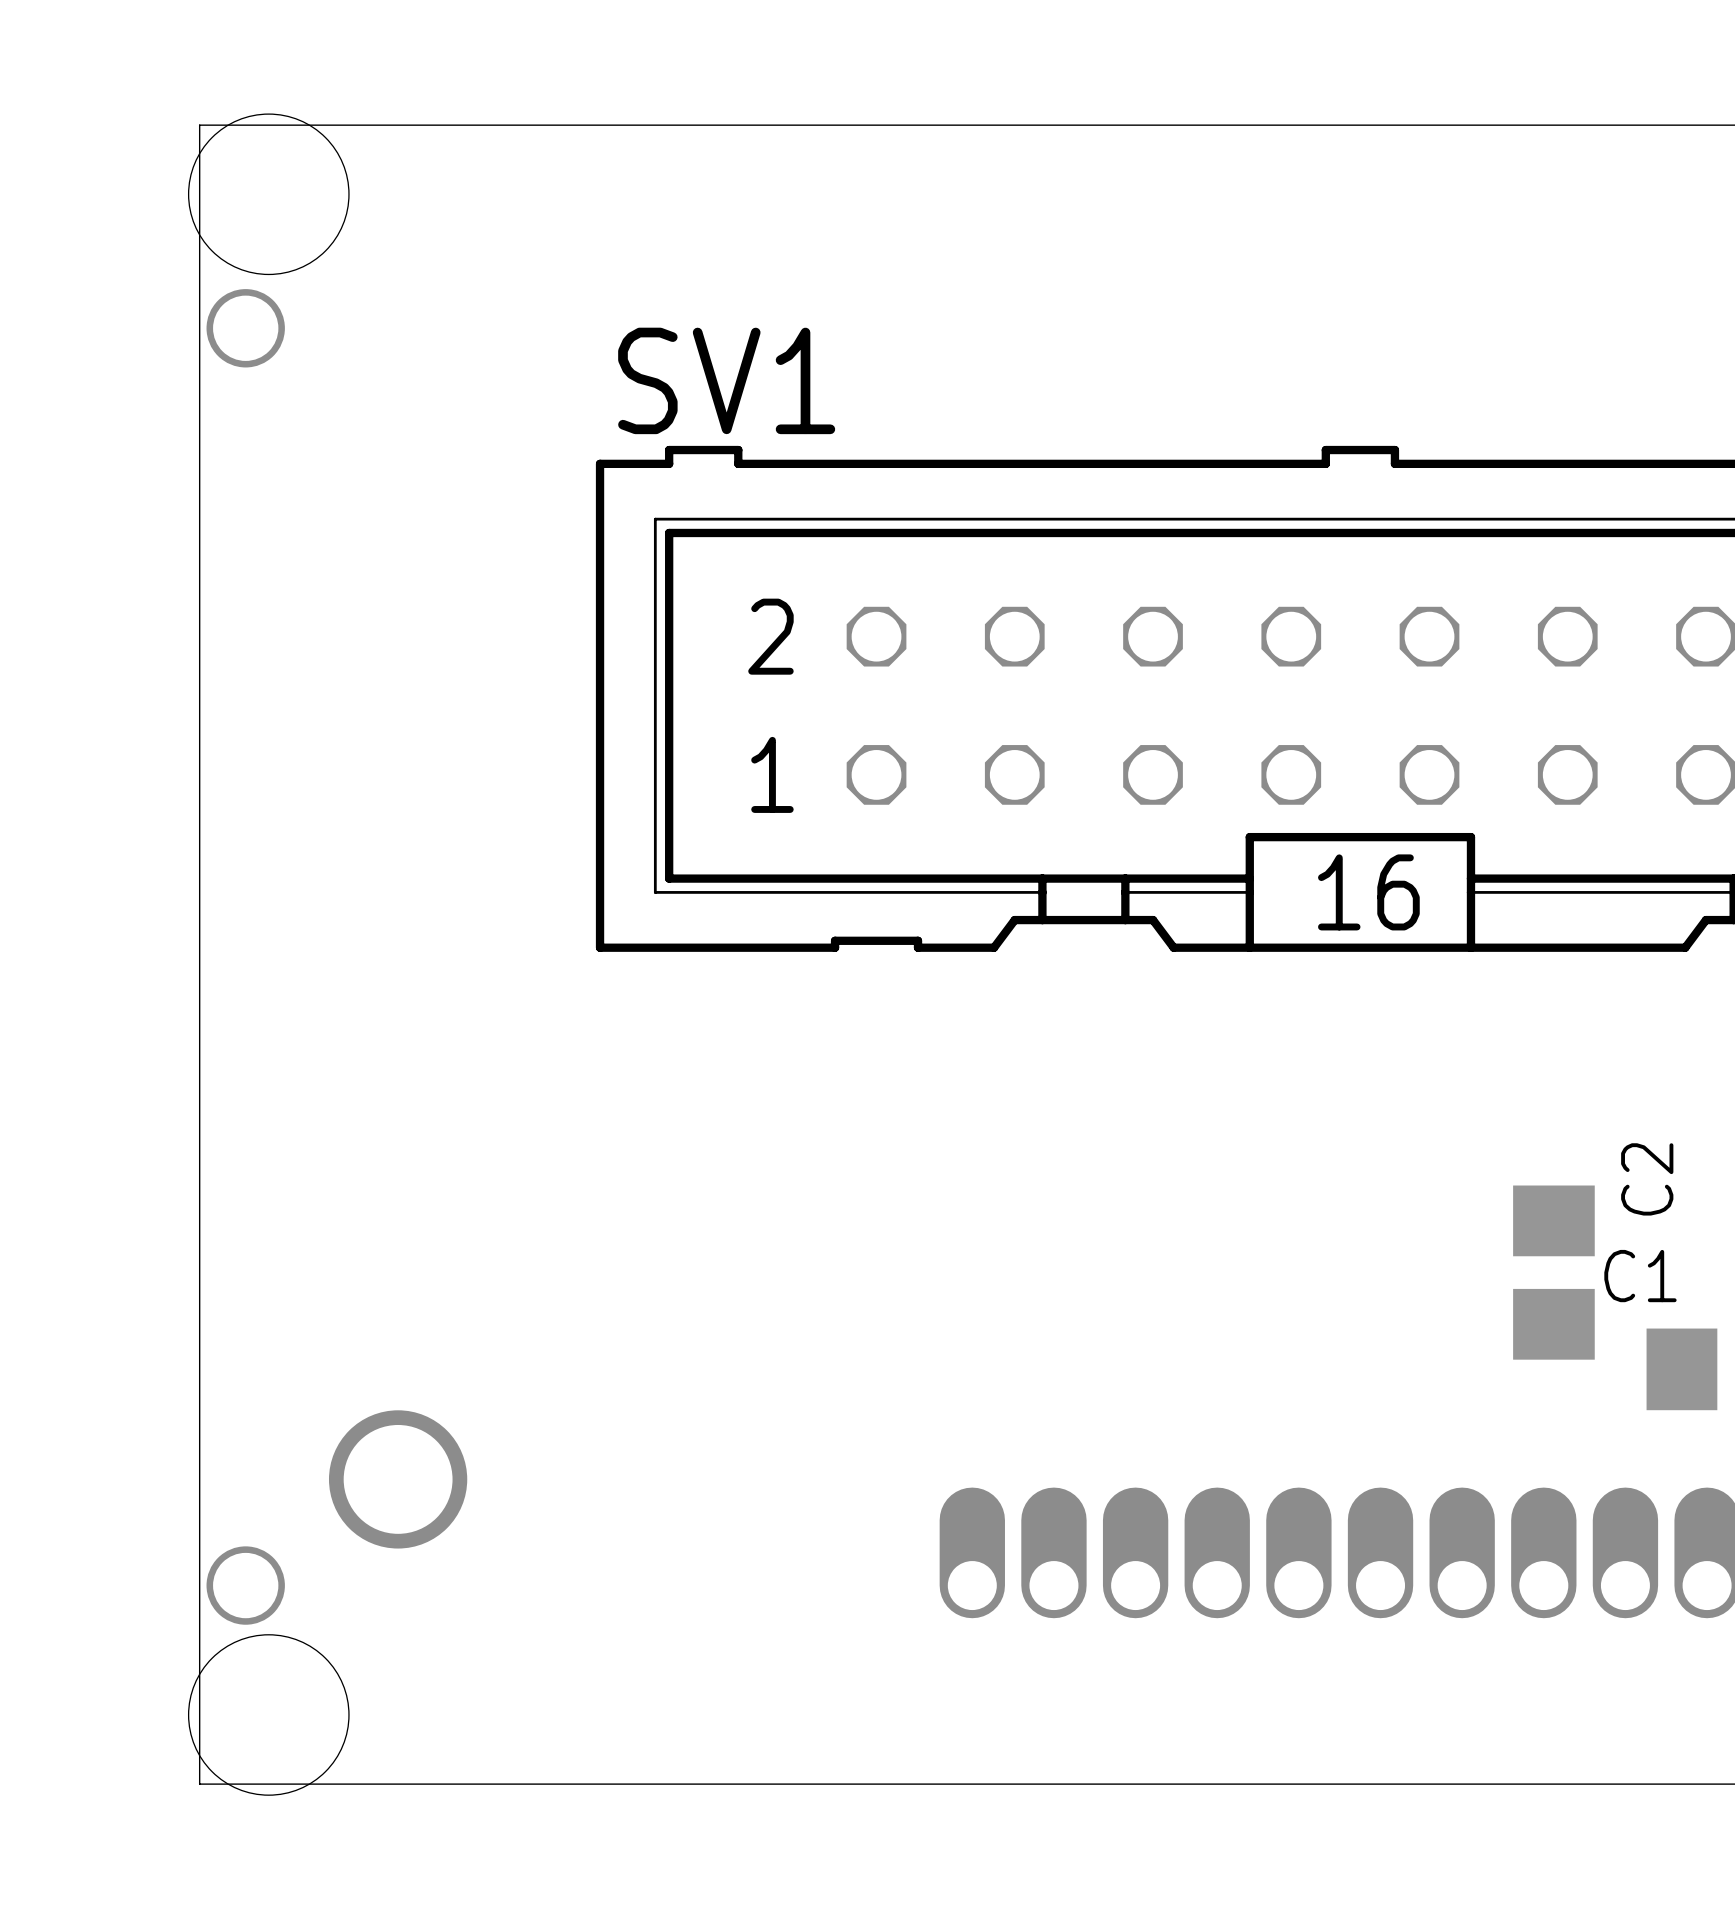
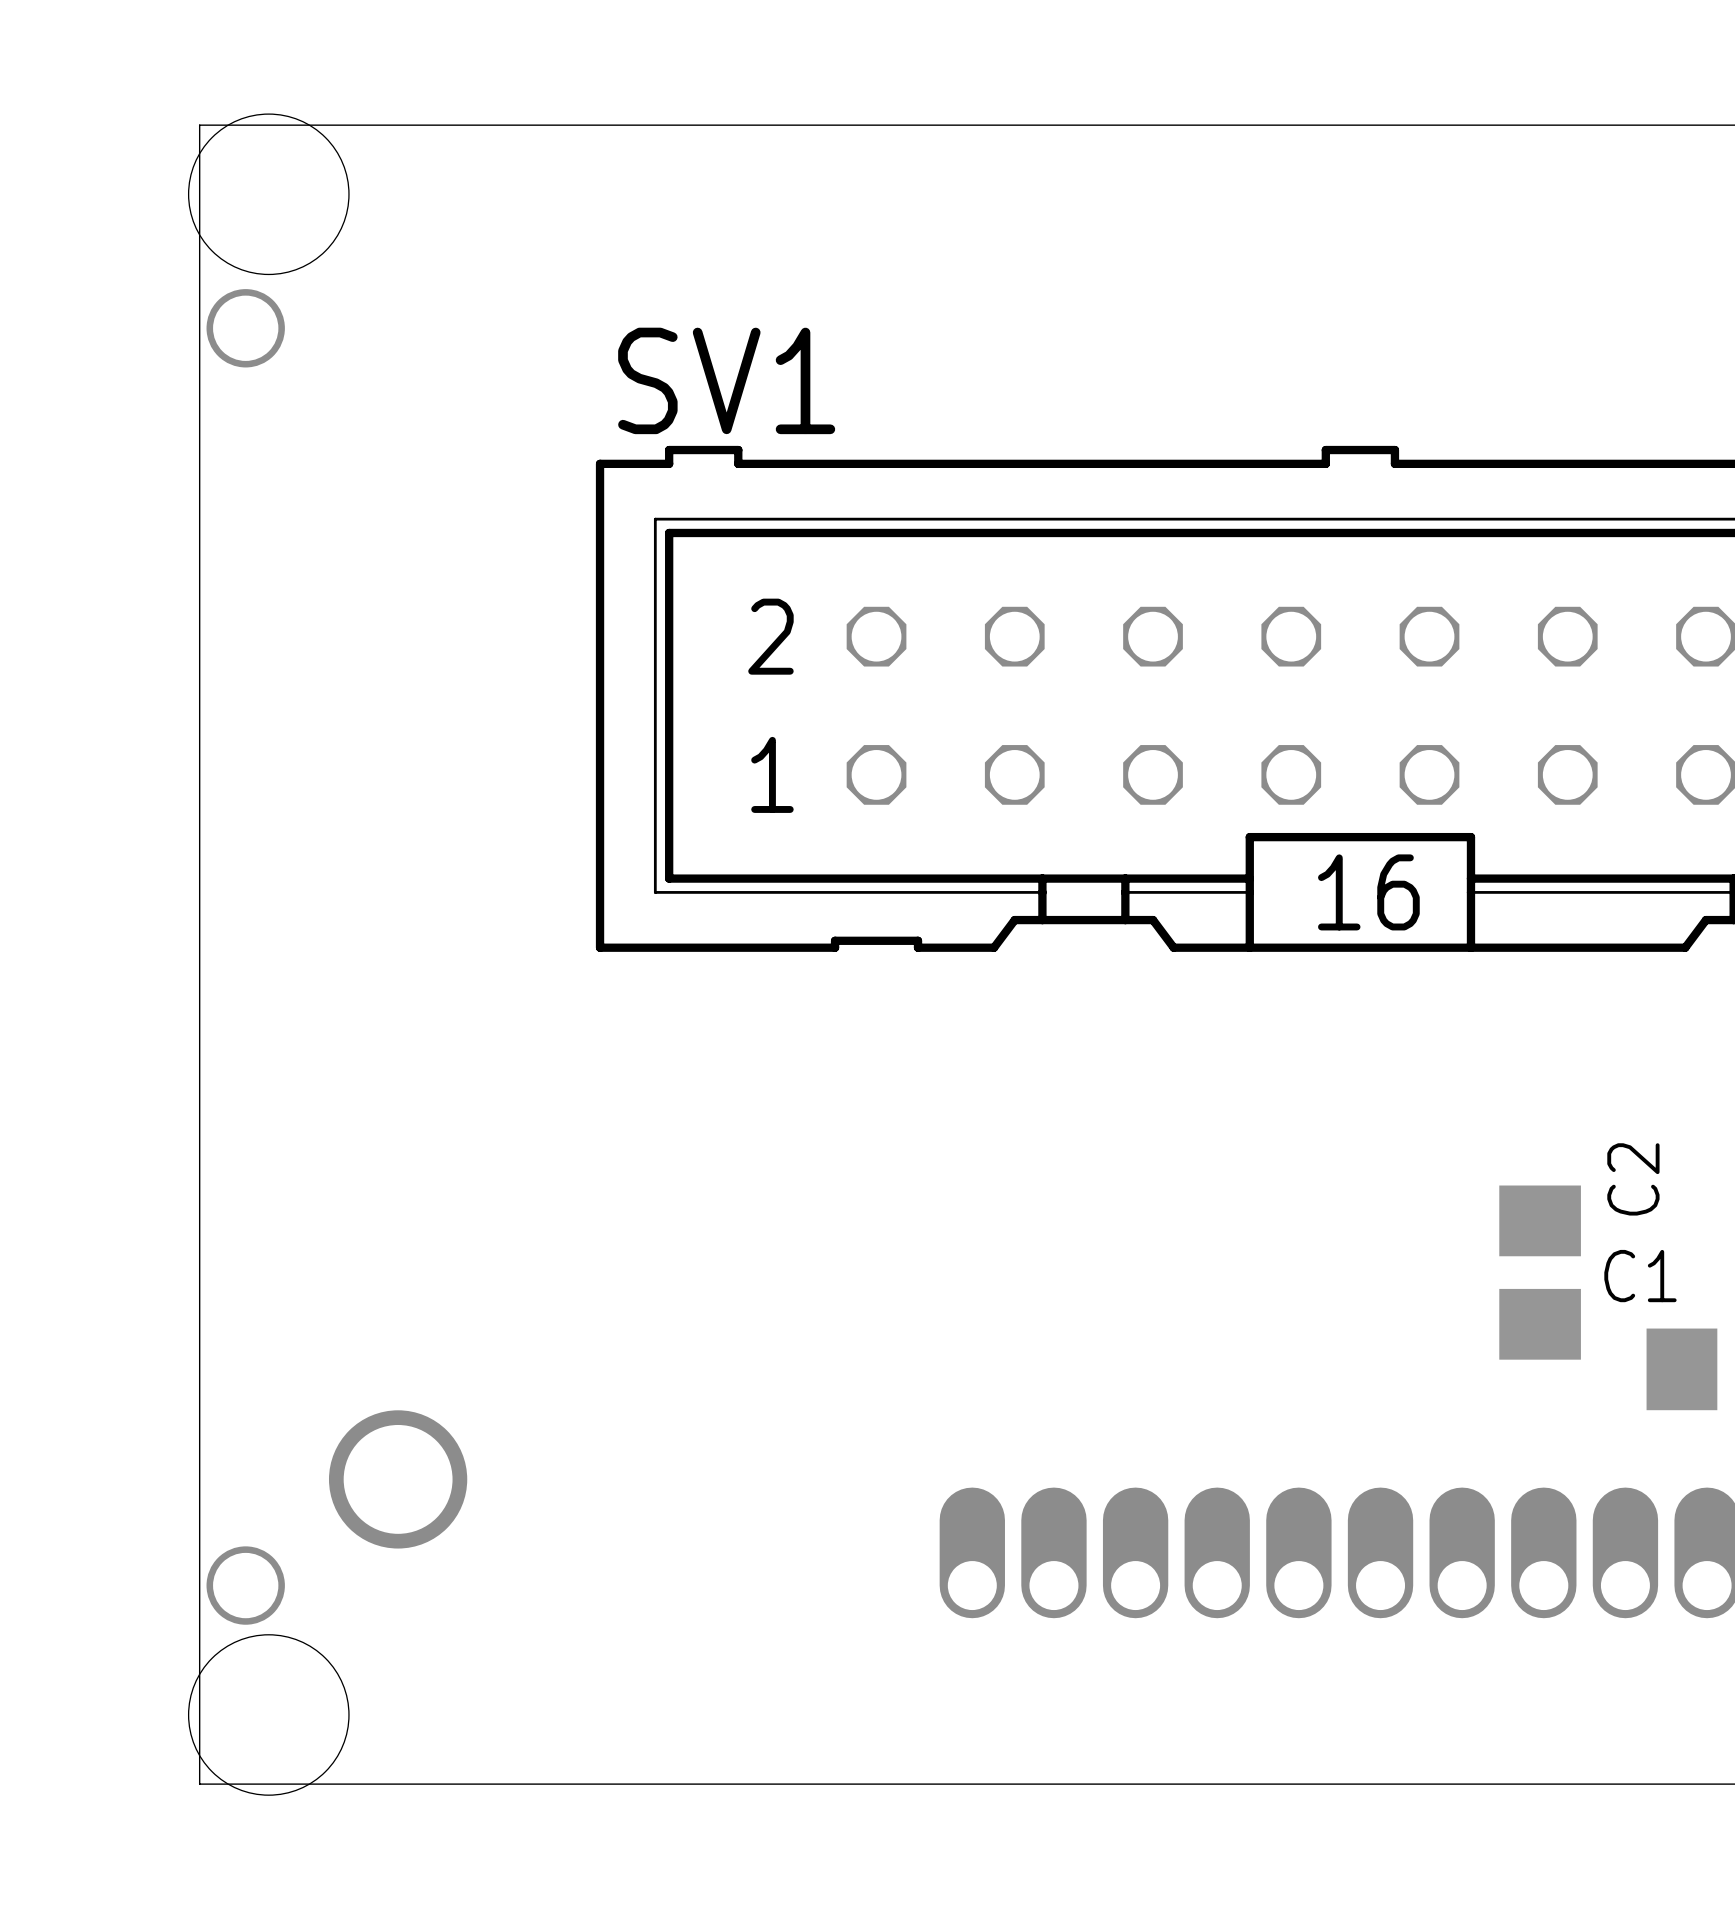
C2 position: (1553, 1272) -> (1540, 1272)

